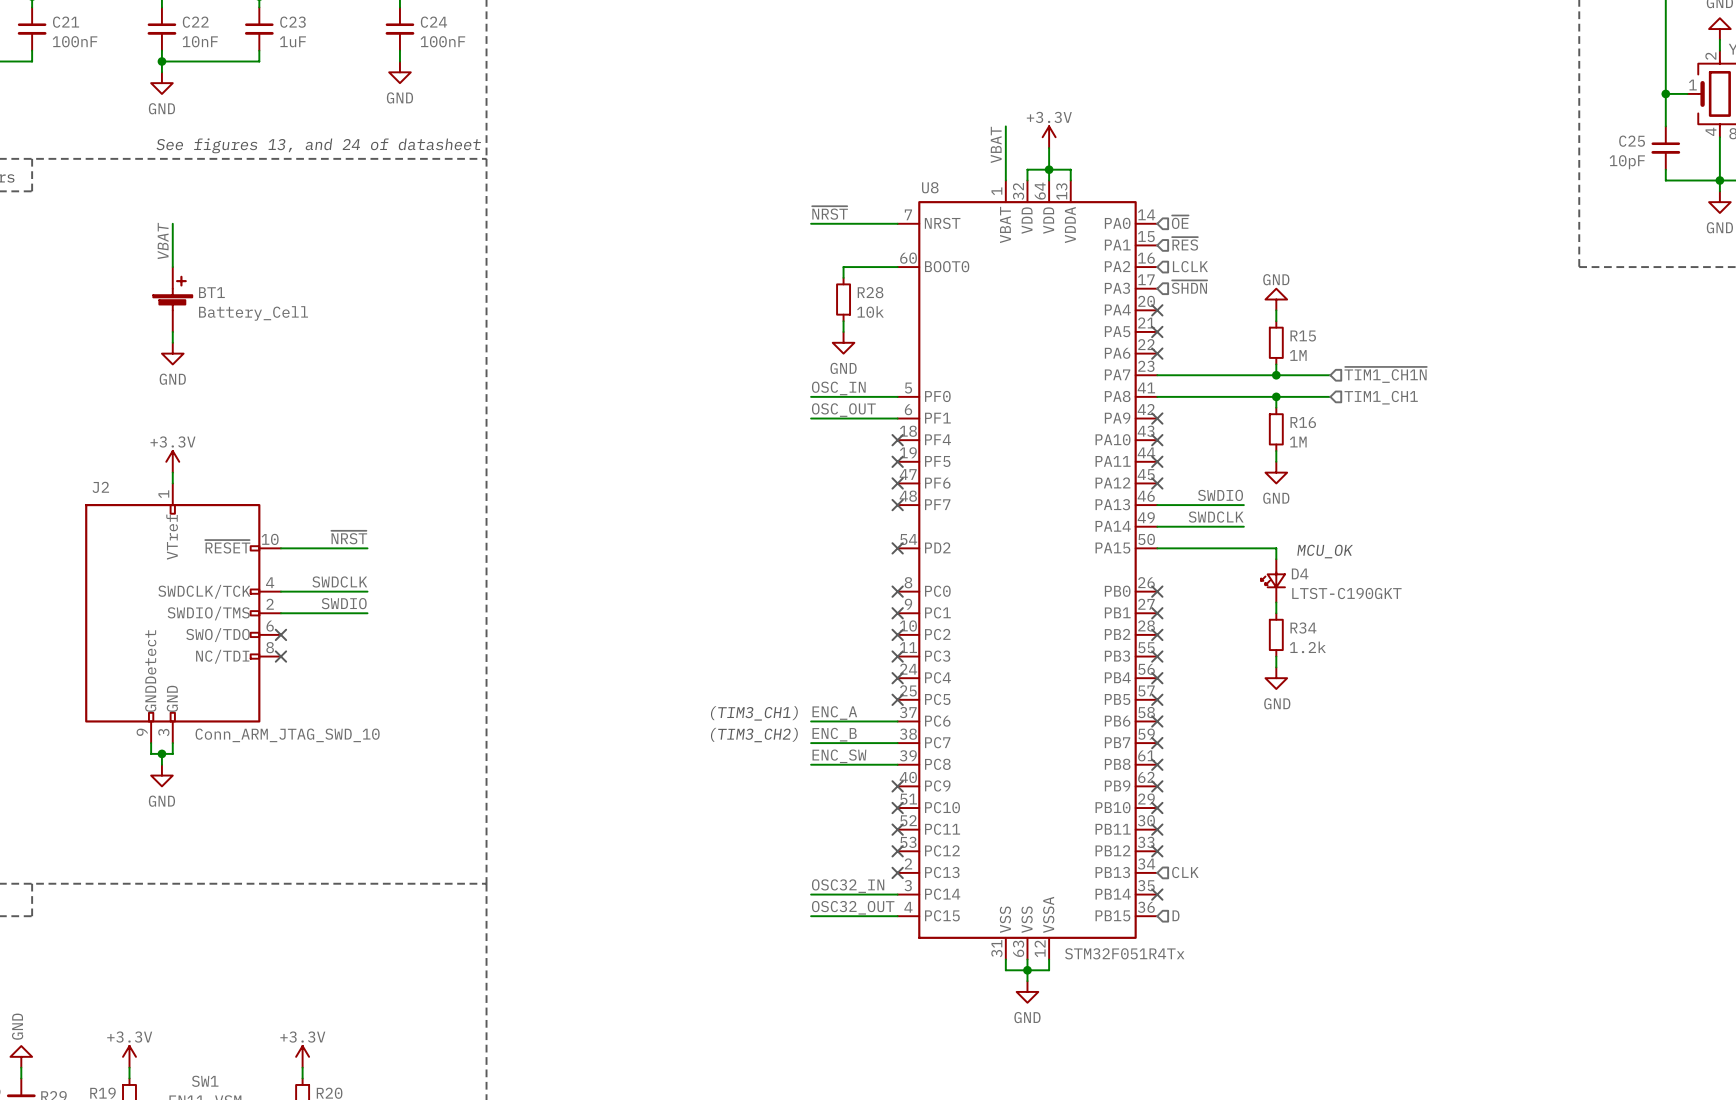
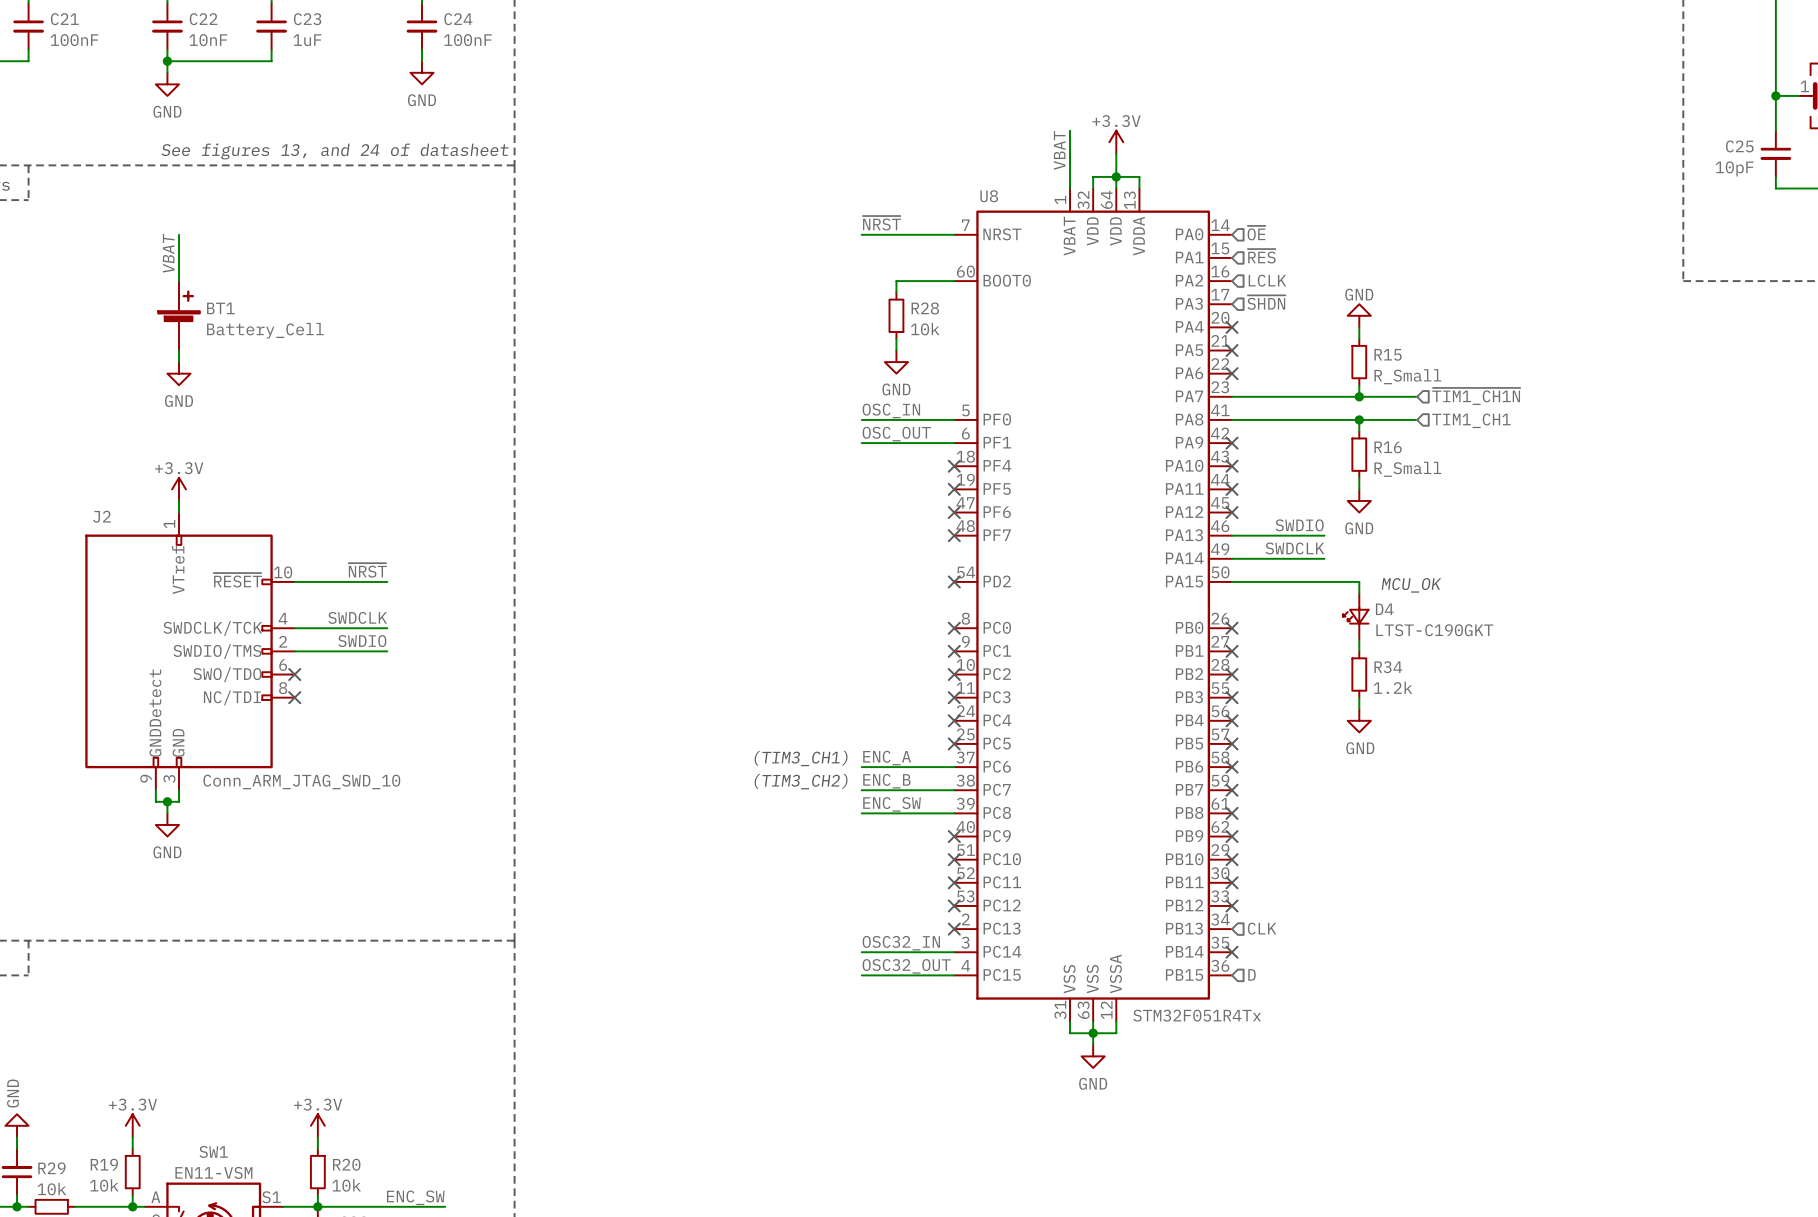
R15 value: 1M (1298, 355) -> R_Small (1407, 376)
R16 value: 1M (1298, 442) -> R_Small (1407, 469)

